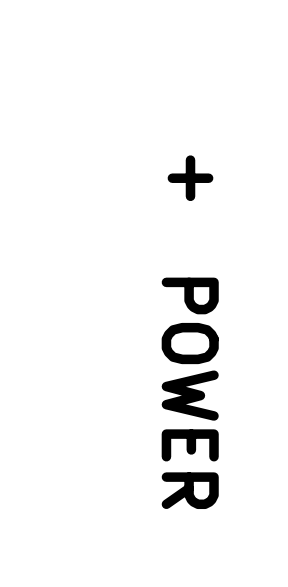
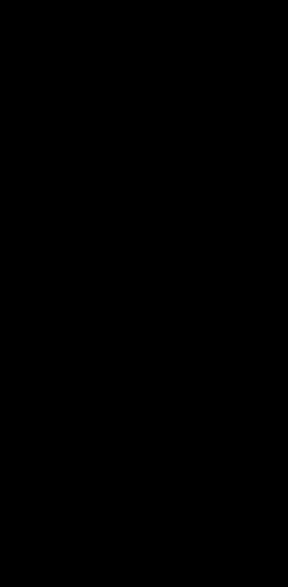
text: + (190, 178) -> none
text: POWER (190, 393) -> none

